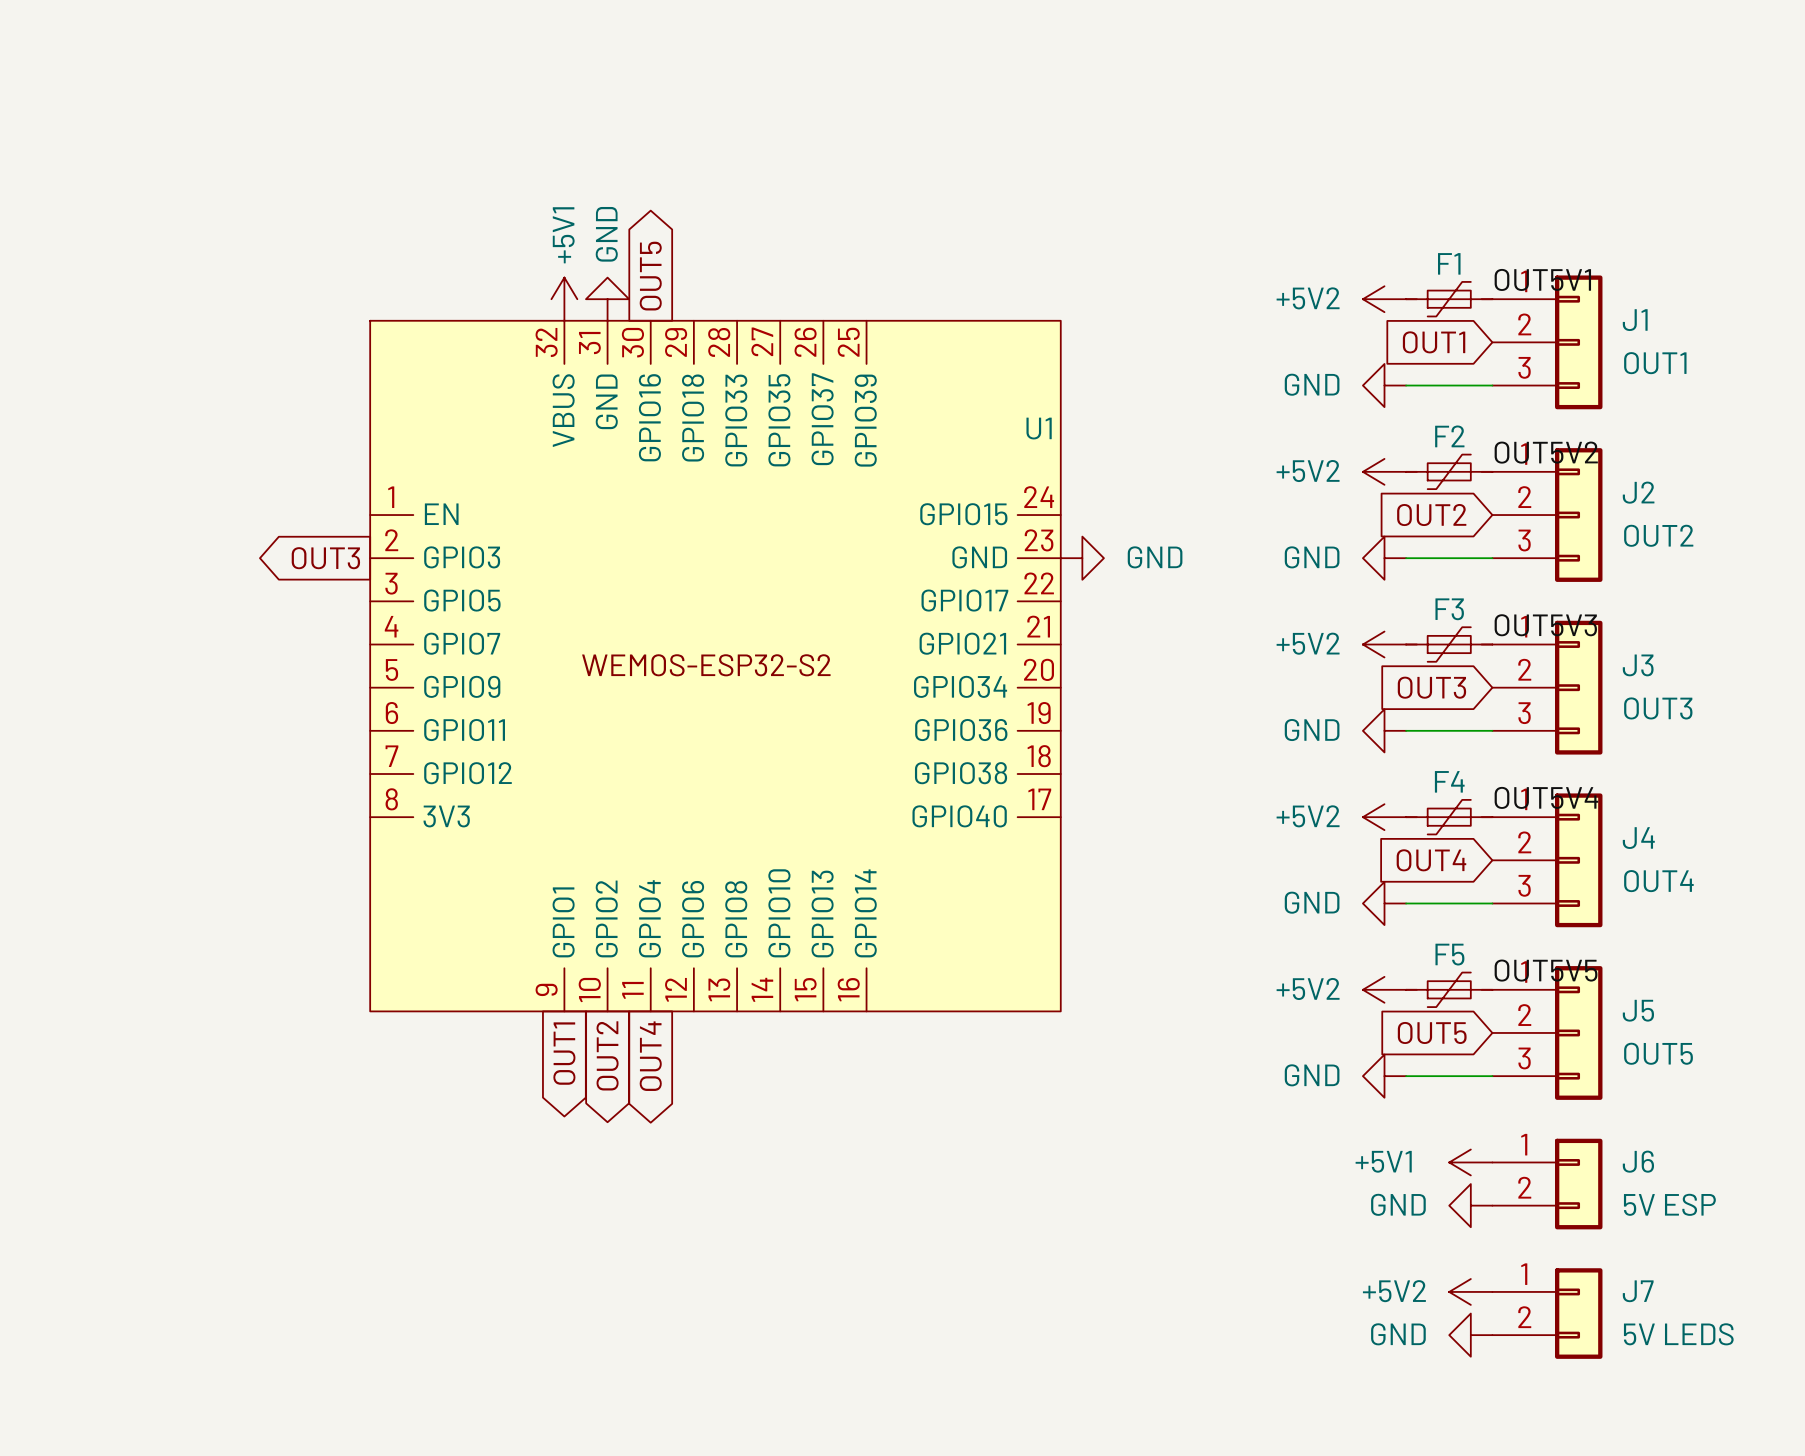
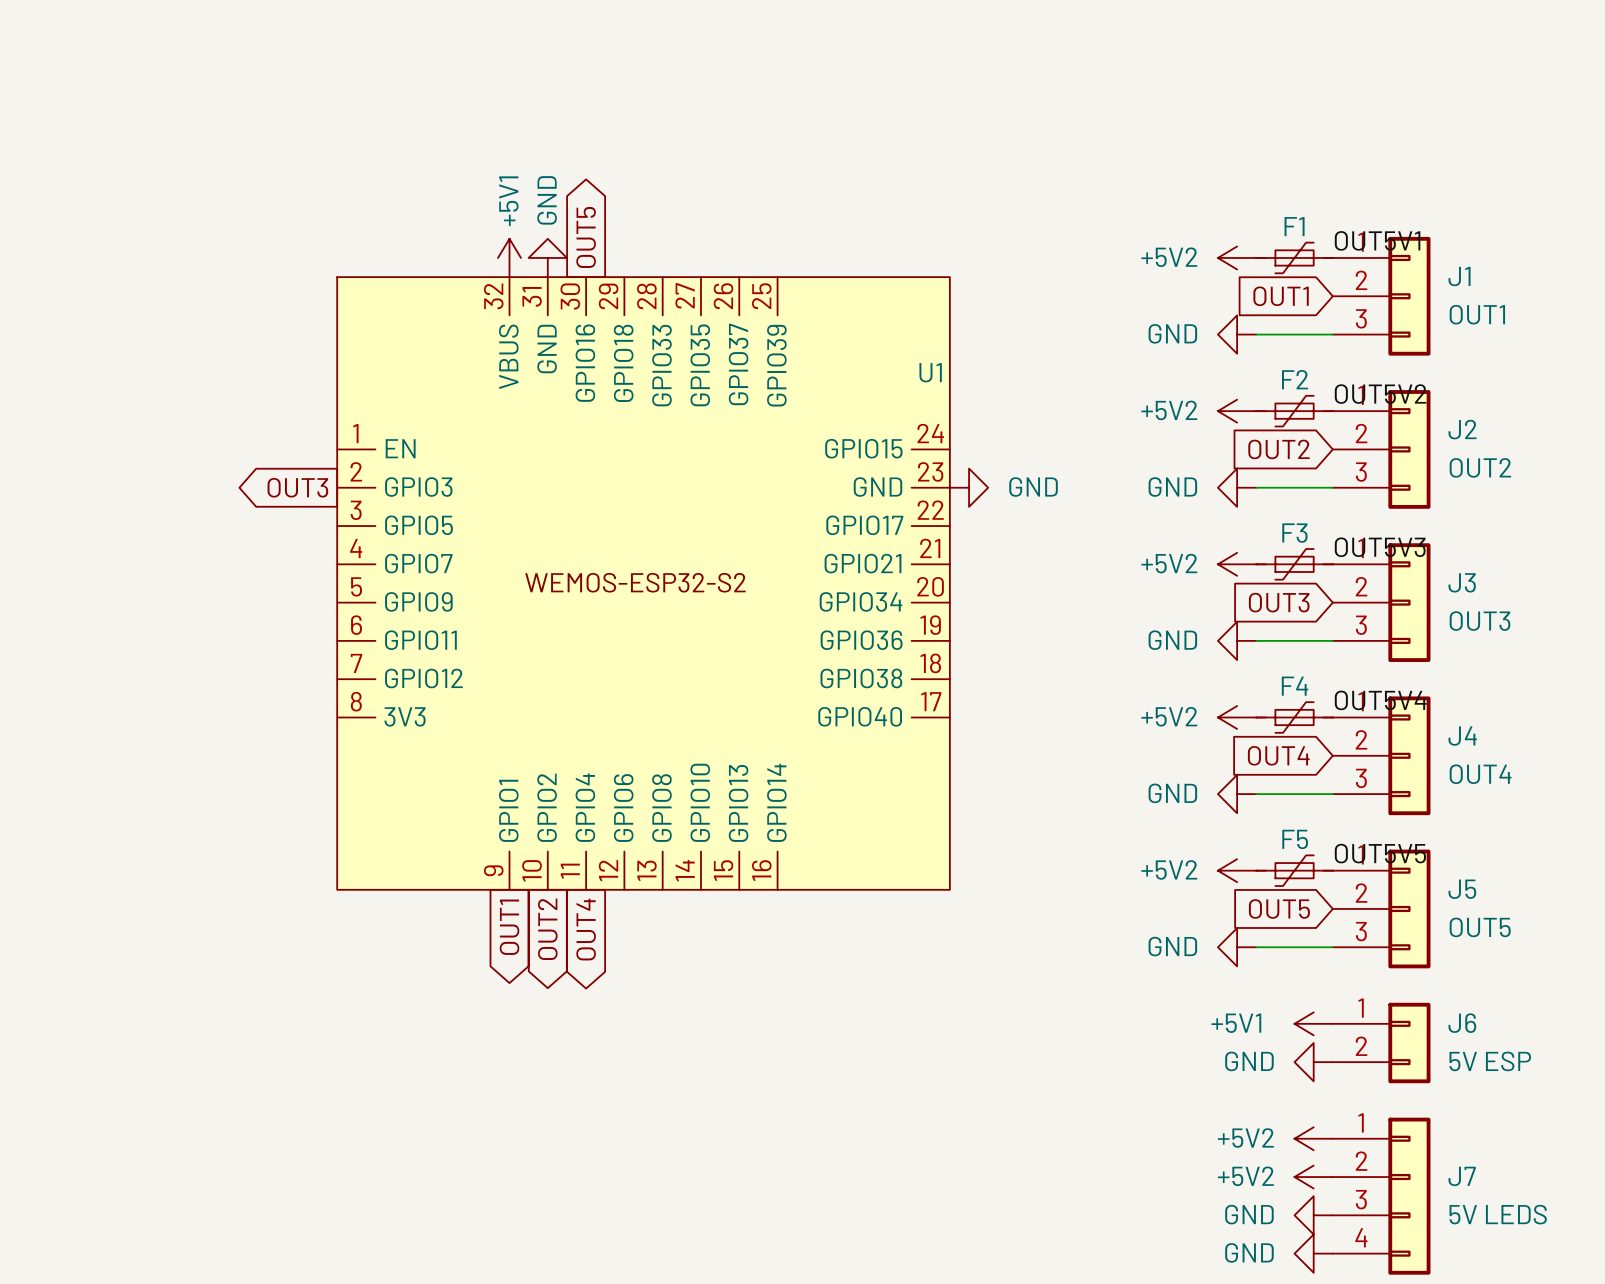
J7 symbol: [1492, 1268, 1603, 1359] -> [1332, 1117, 1431, 1275]
power symbol: GND (1470, 1335) -> +5V2 (1313, 1177)
power symbol: none -> GND (1313, 1215)
power symbol: none -> GND (1313, 1253)

